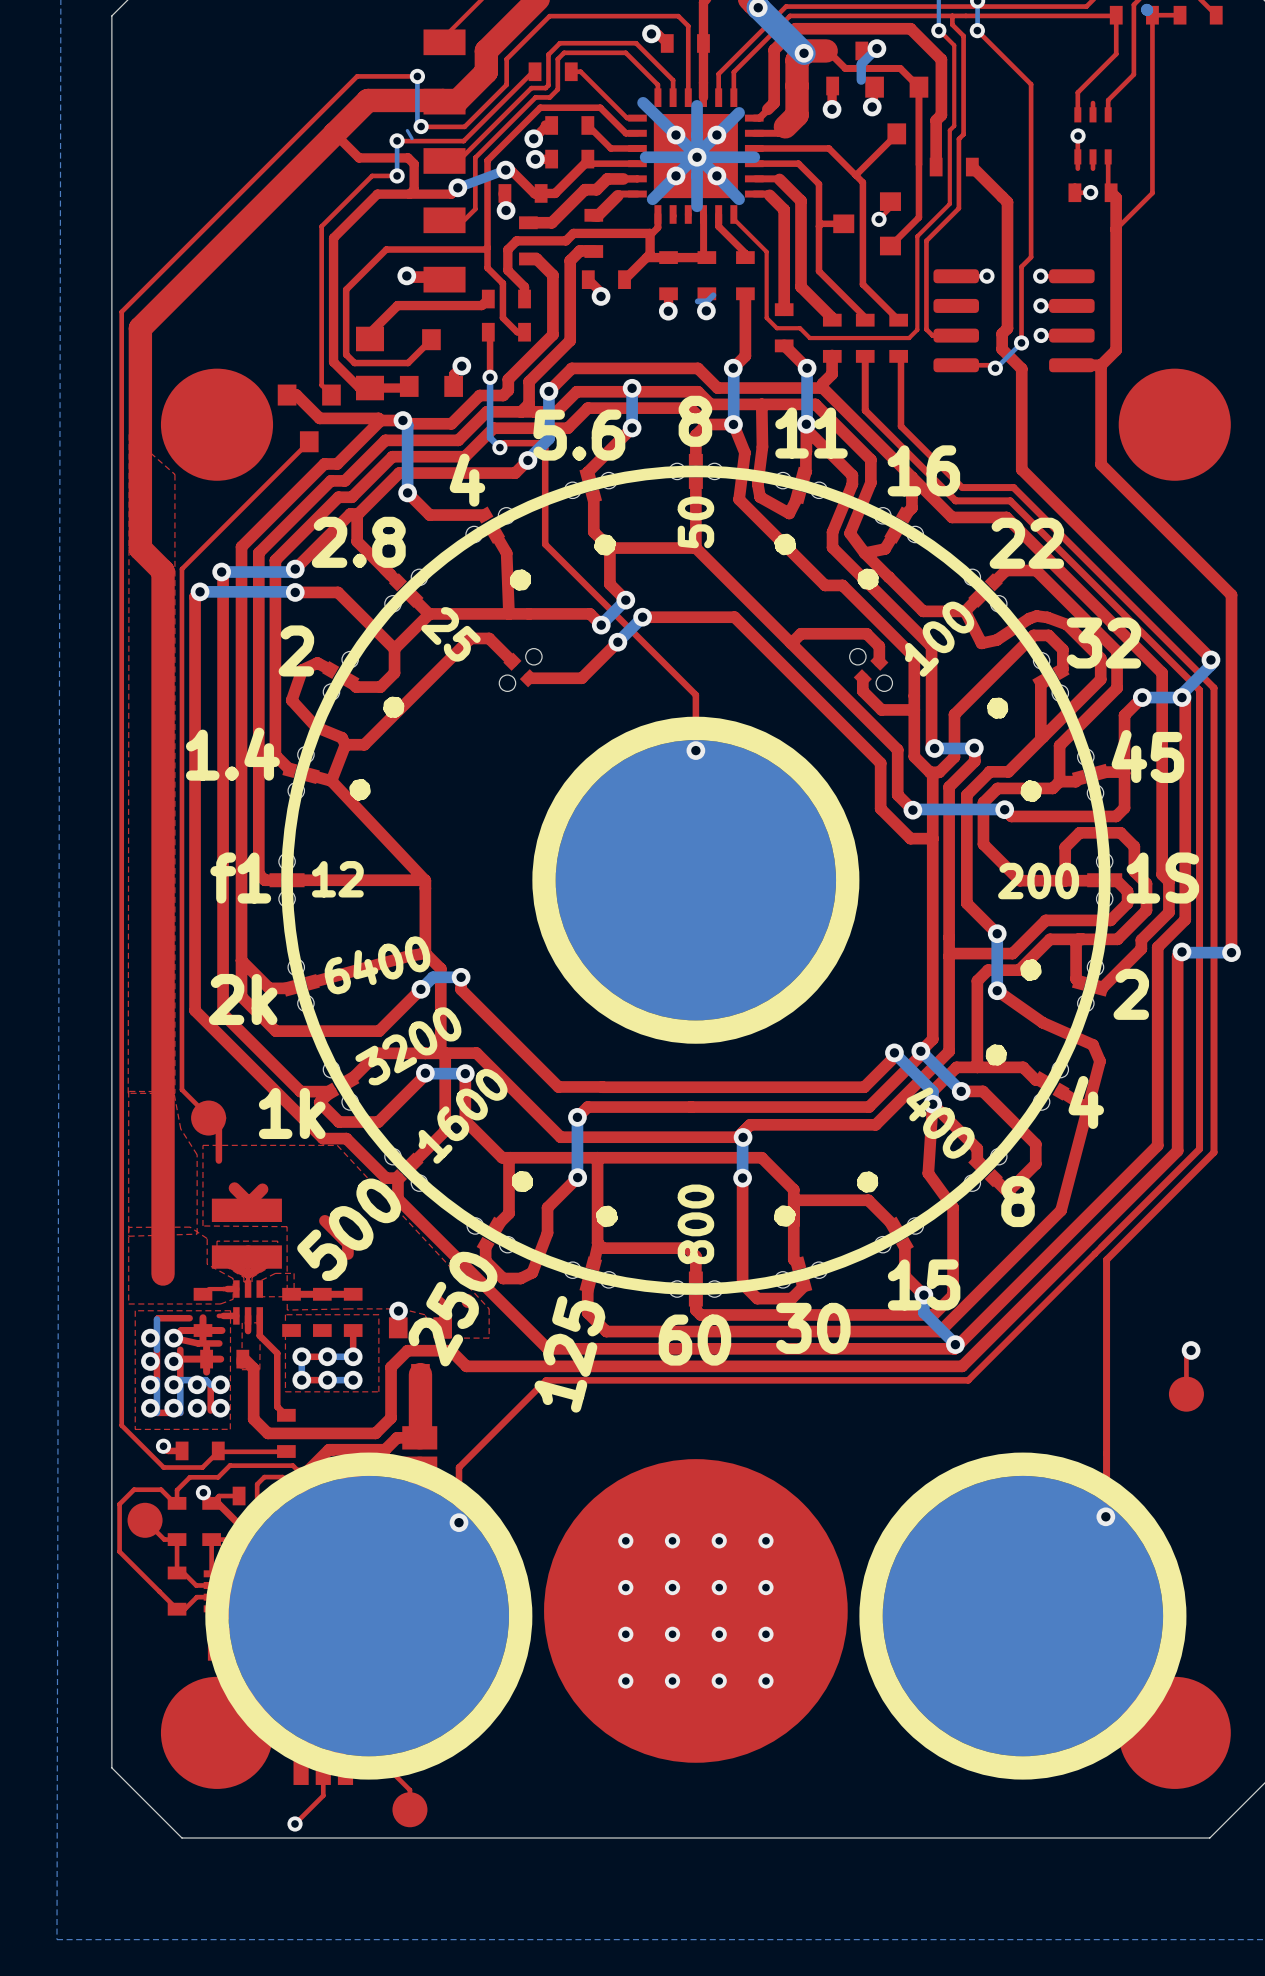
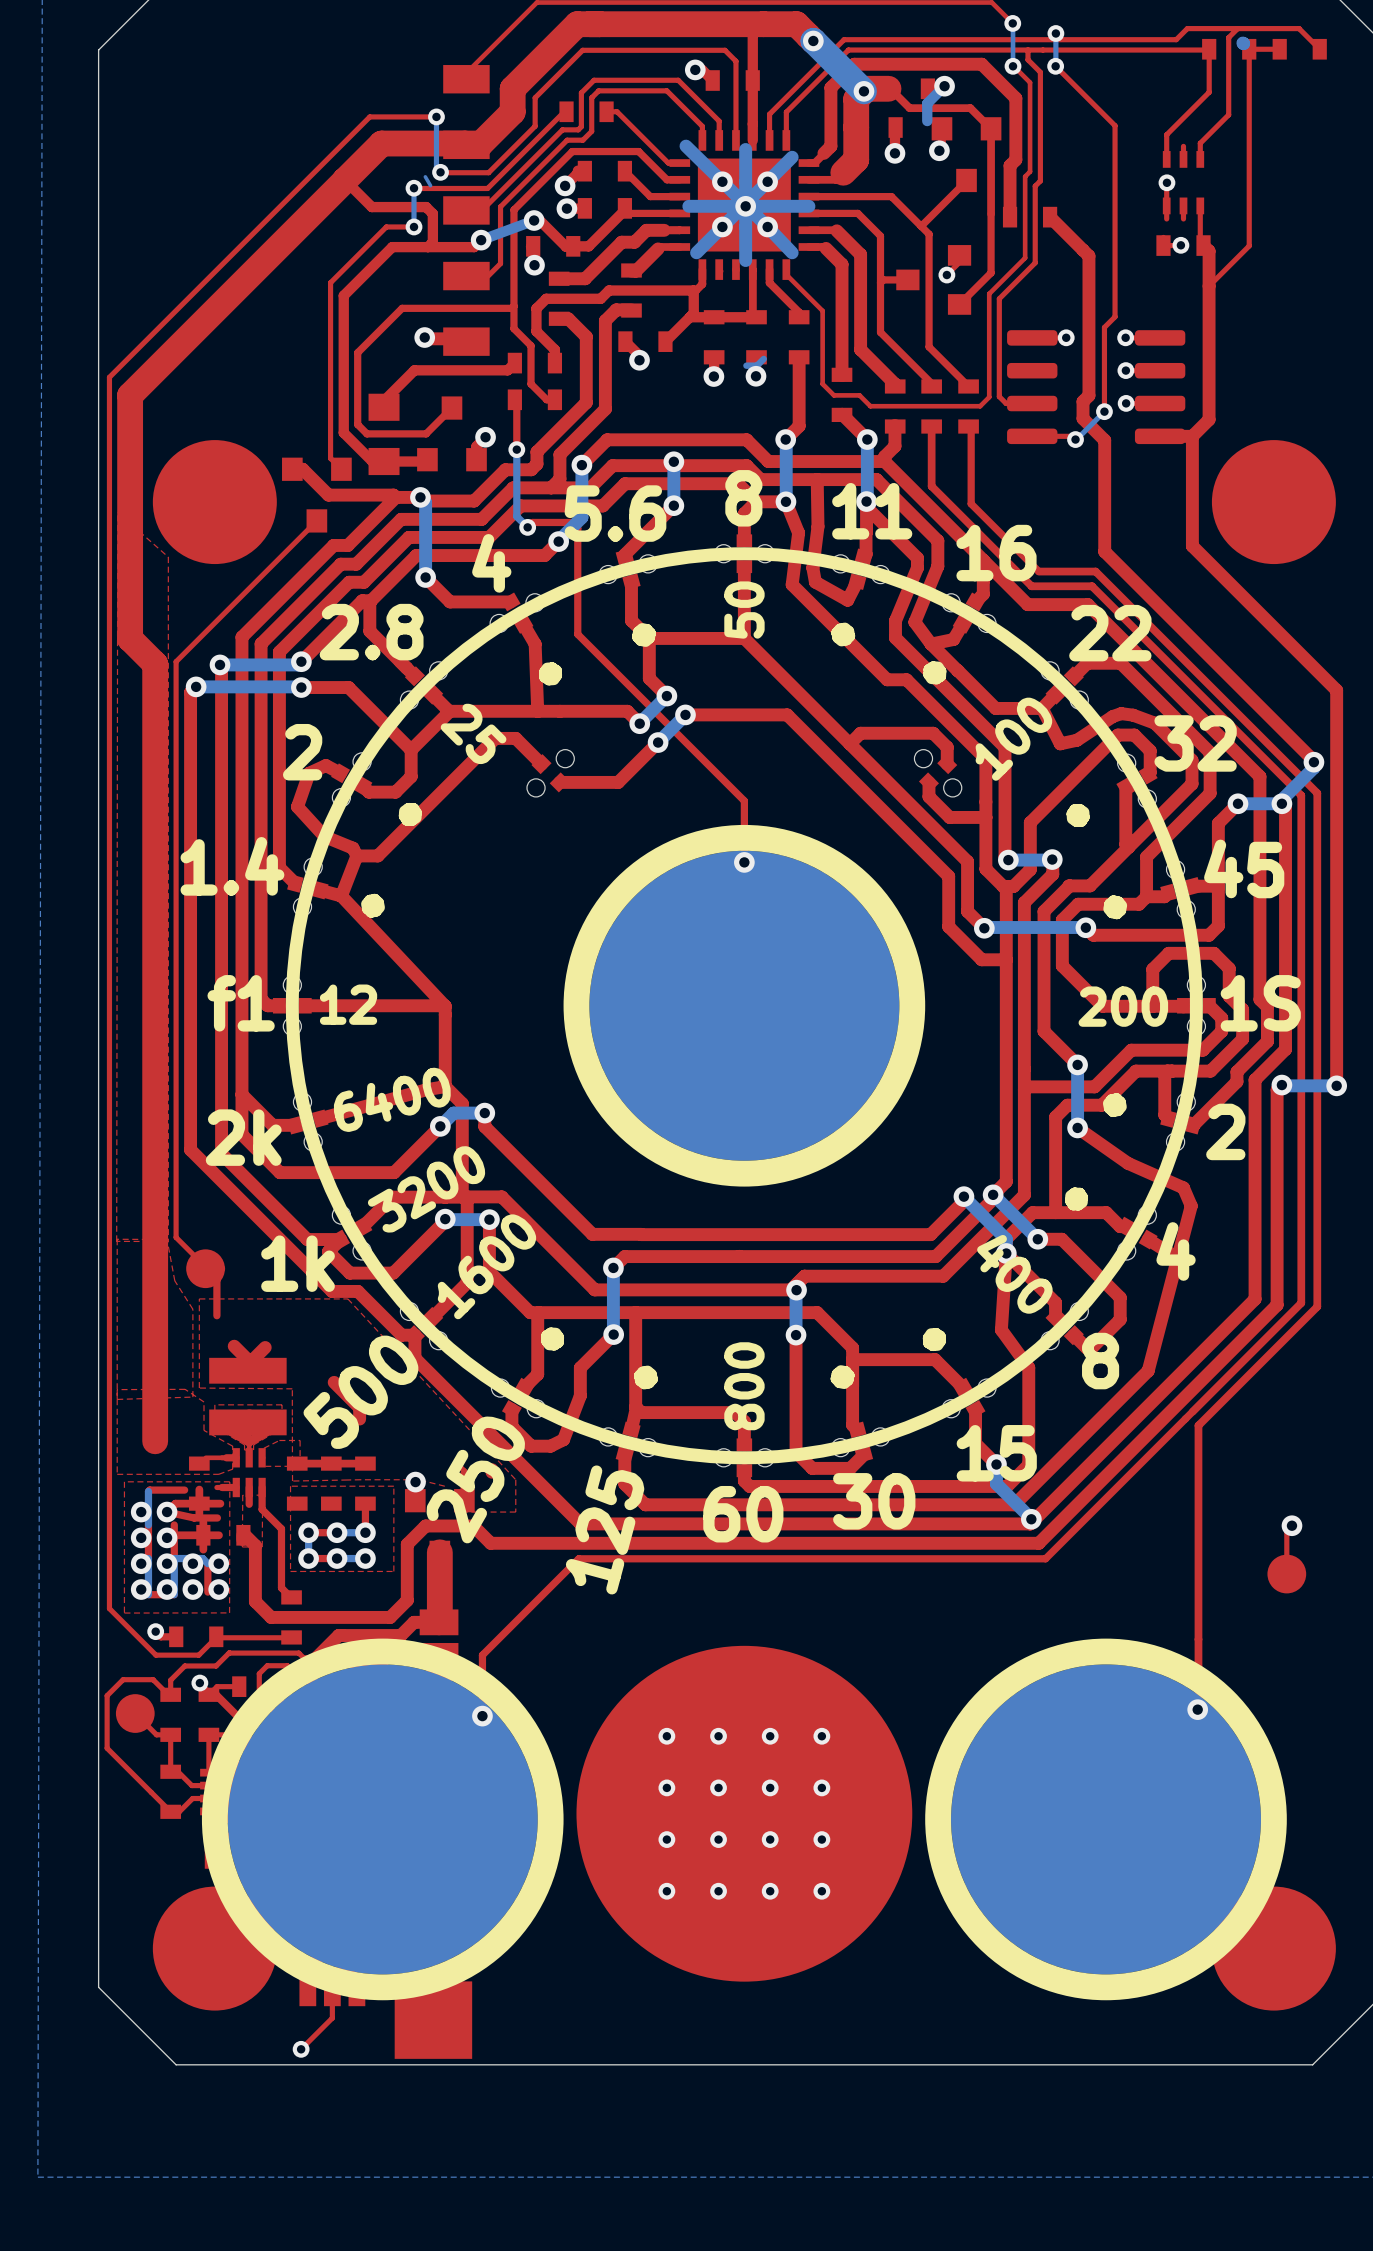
part footprint: [392, 1792, 428, 1828] -> [394, 1981, 473, 2059]

